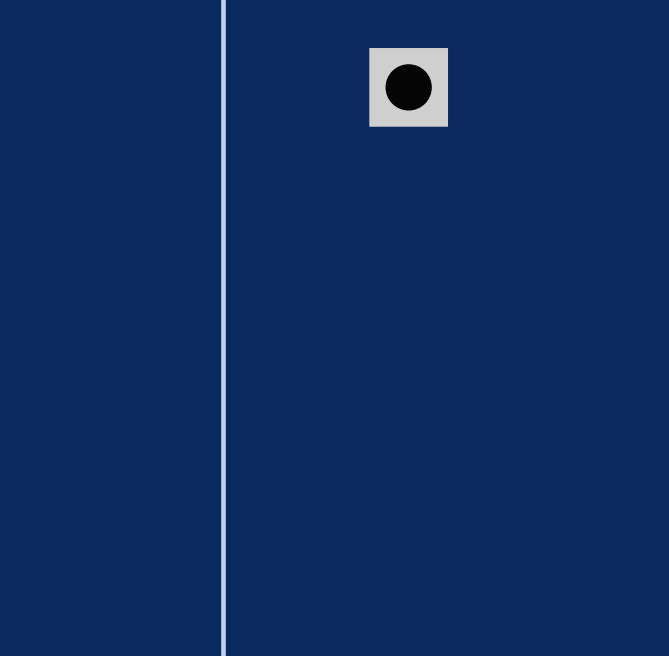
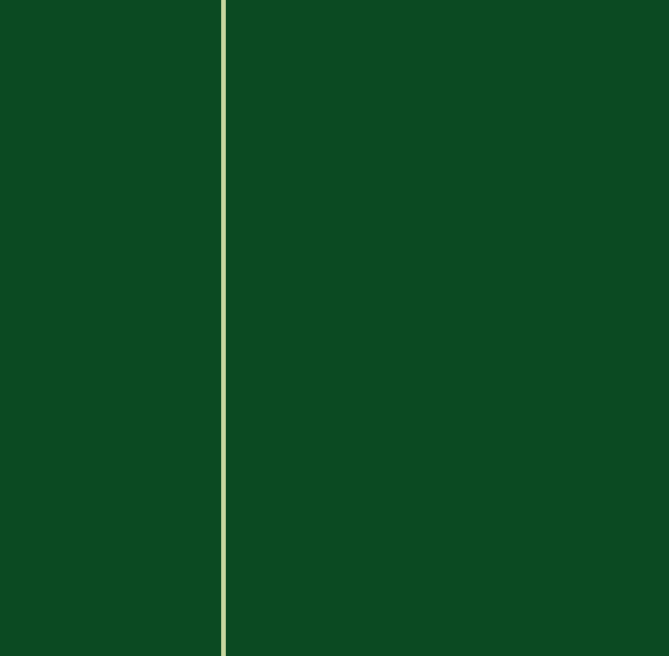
part: (408, 87) -> none

